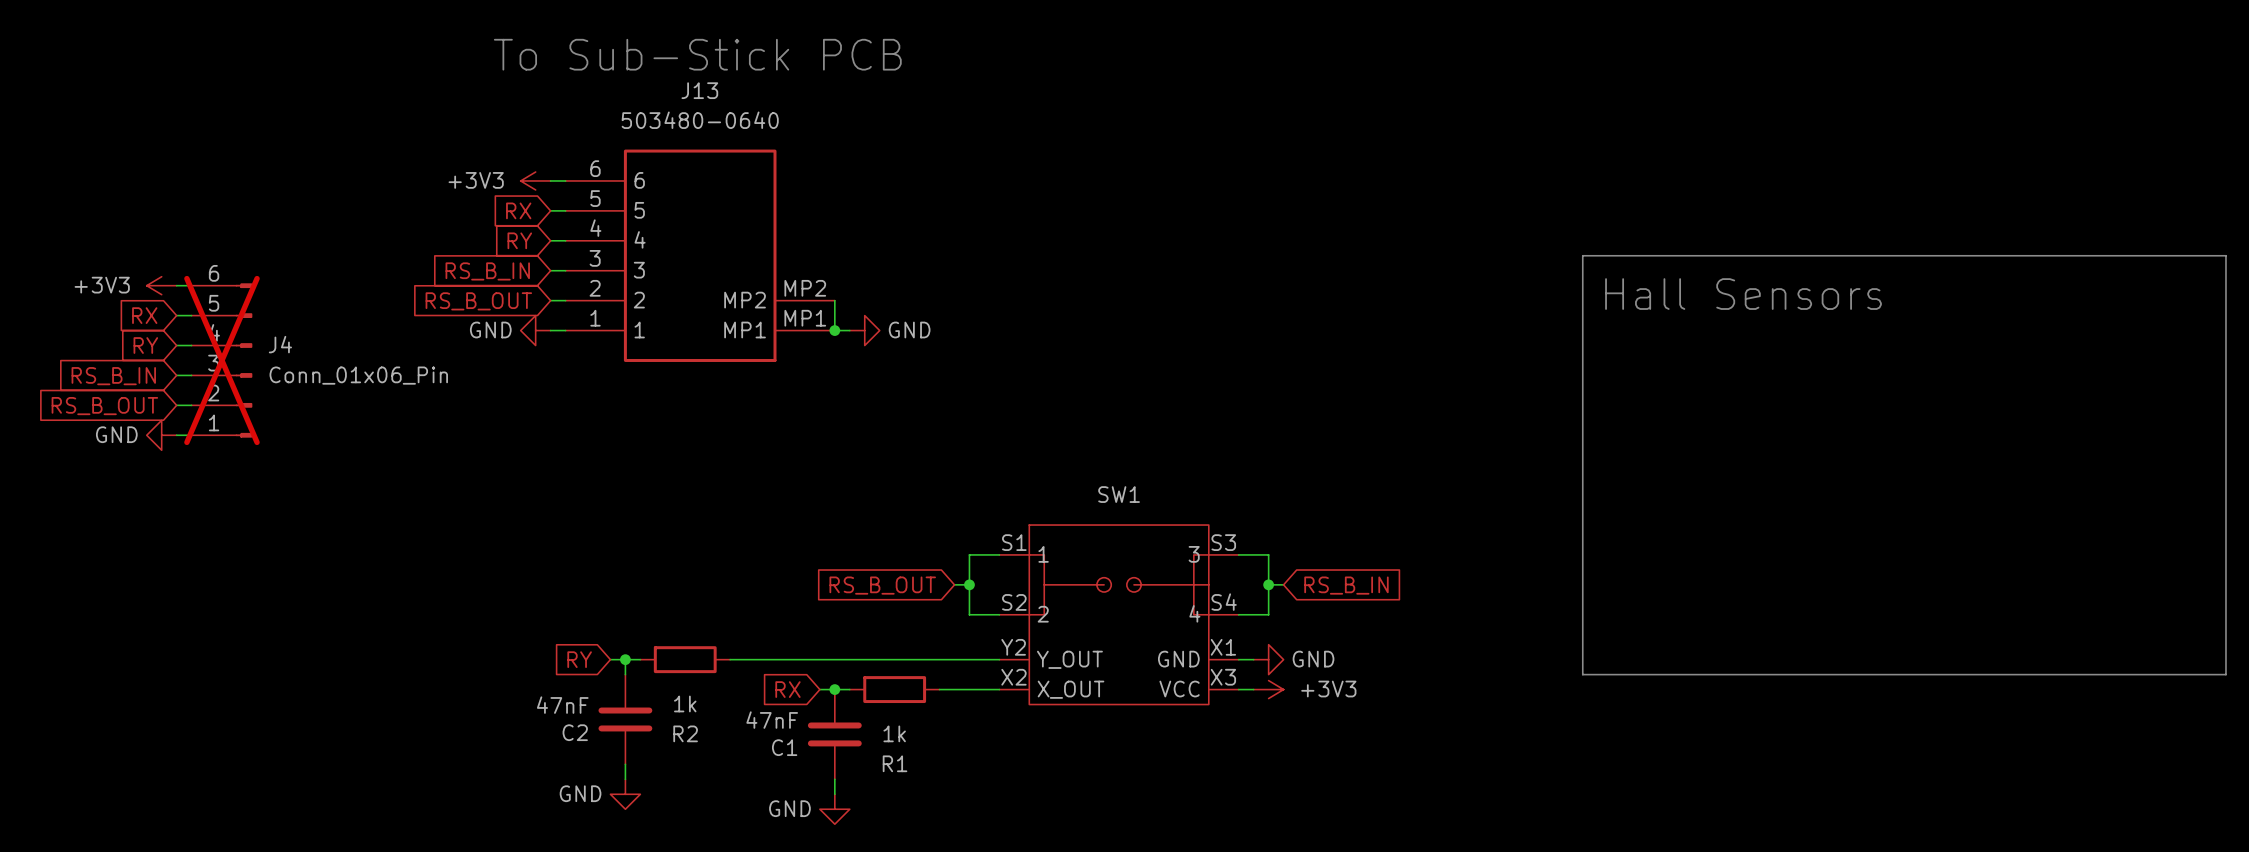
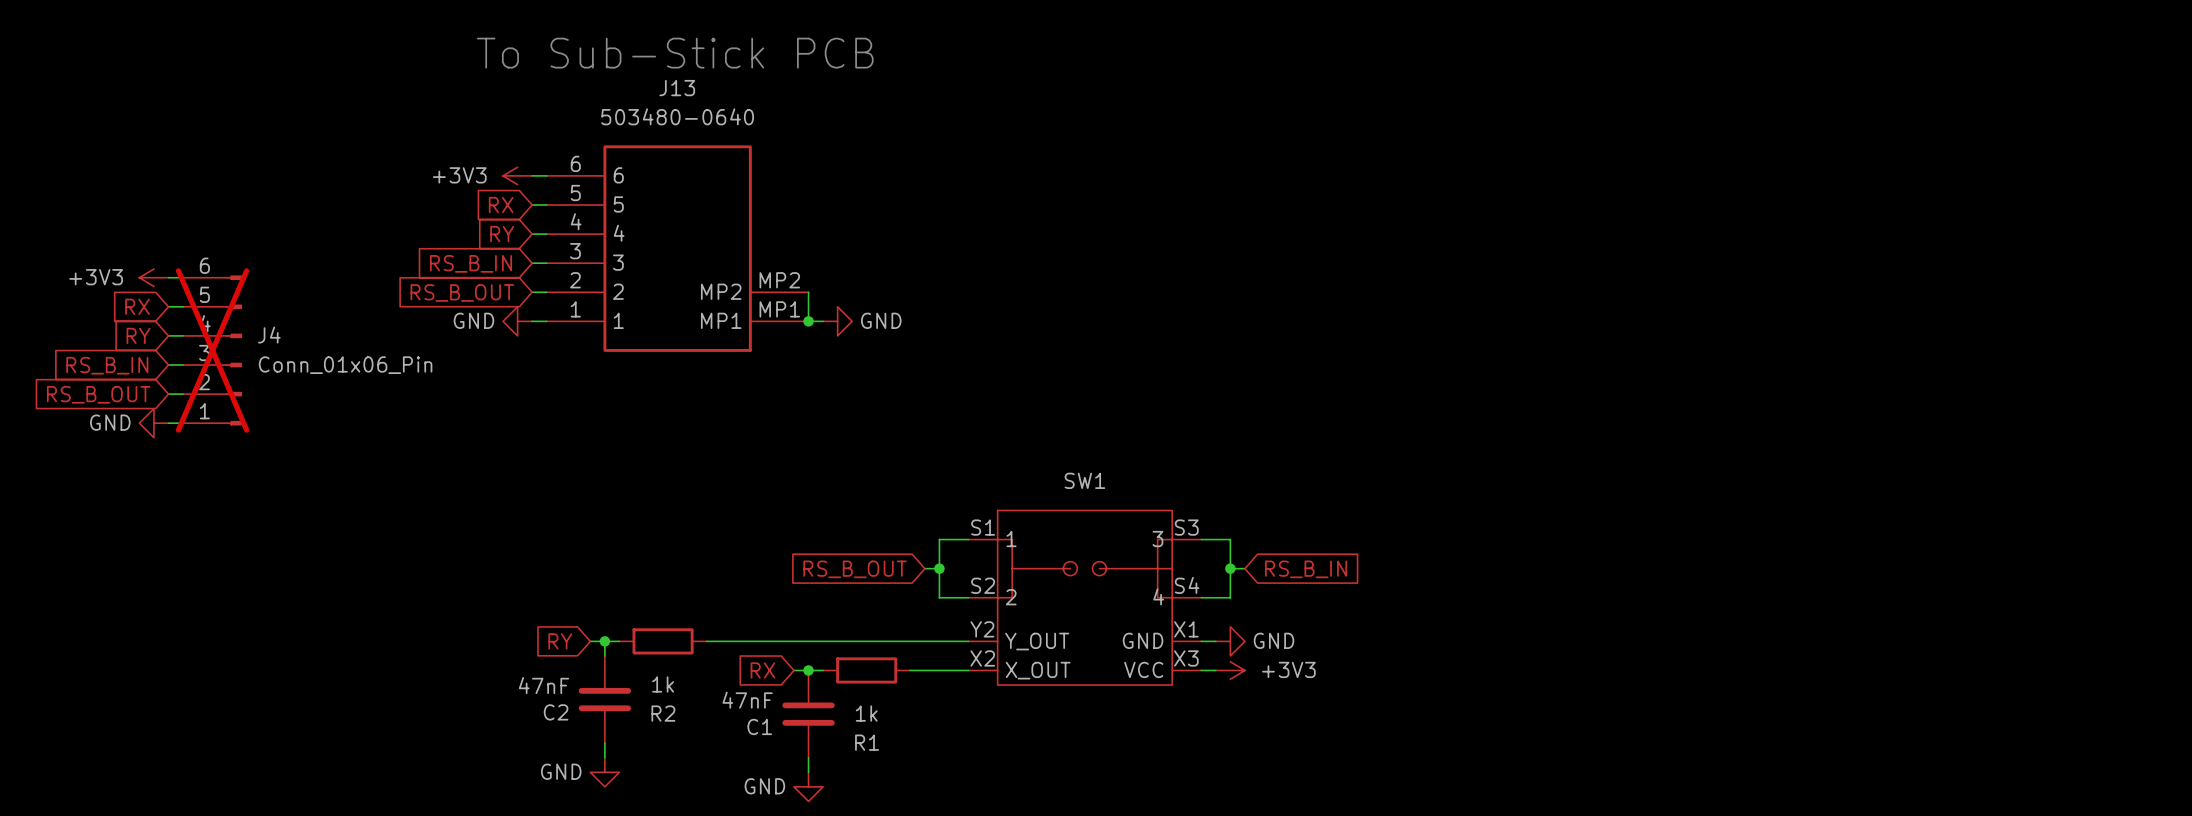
line: (1582, 255) (2225, 255) (2225, 674) (1582, 674) (1582, 255) -> none
text: Hall Sensors (1743, 294) -> none

